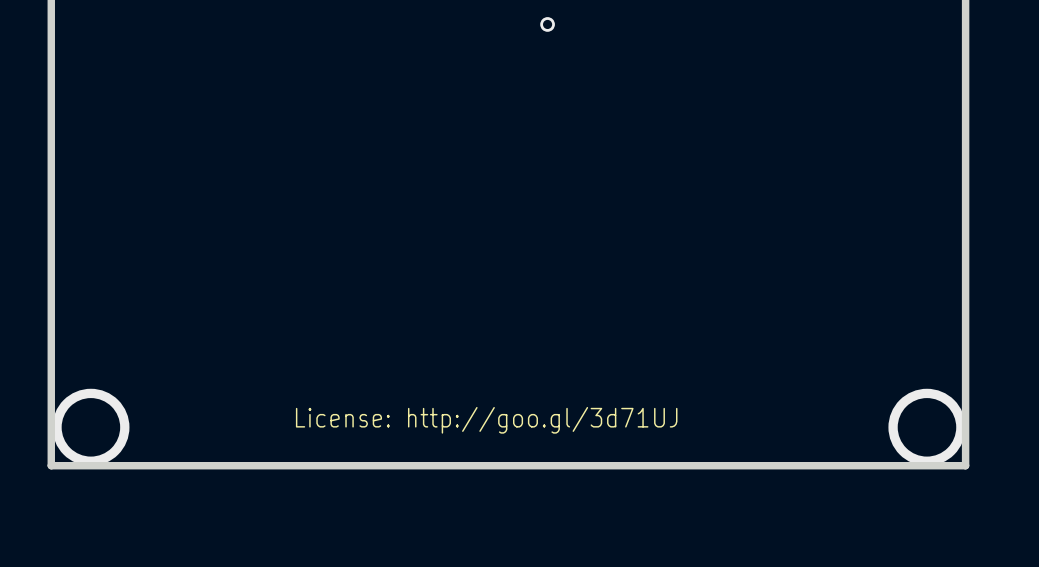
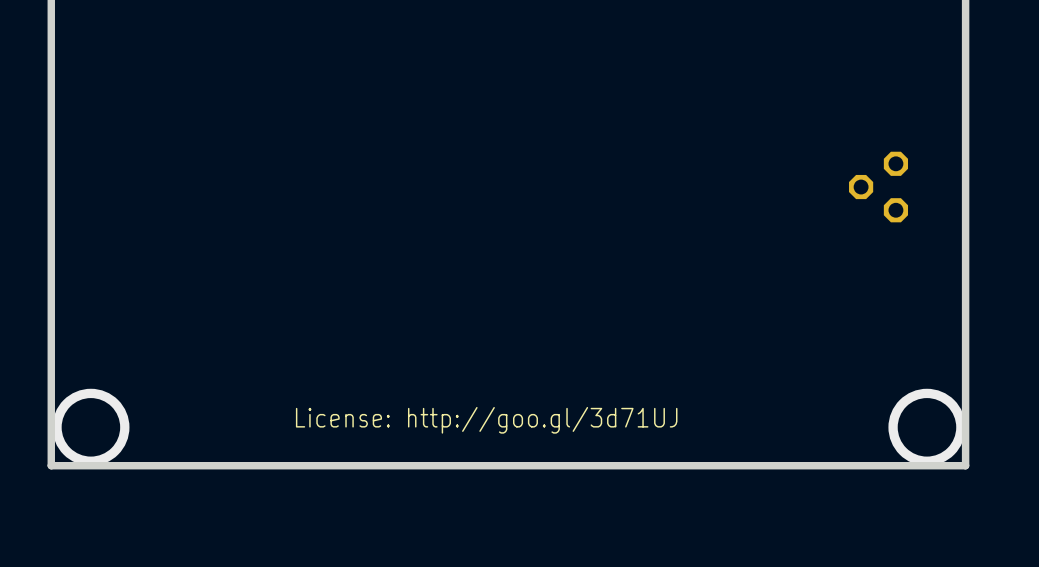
via: (547, 24) -> none
part: none -> (878, 187)

